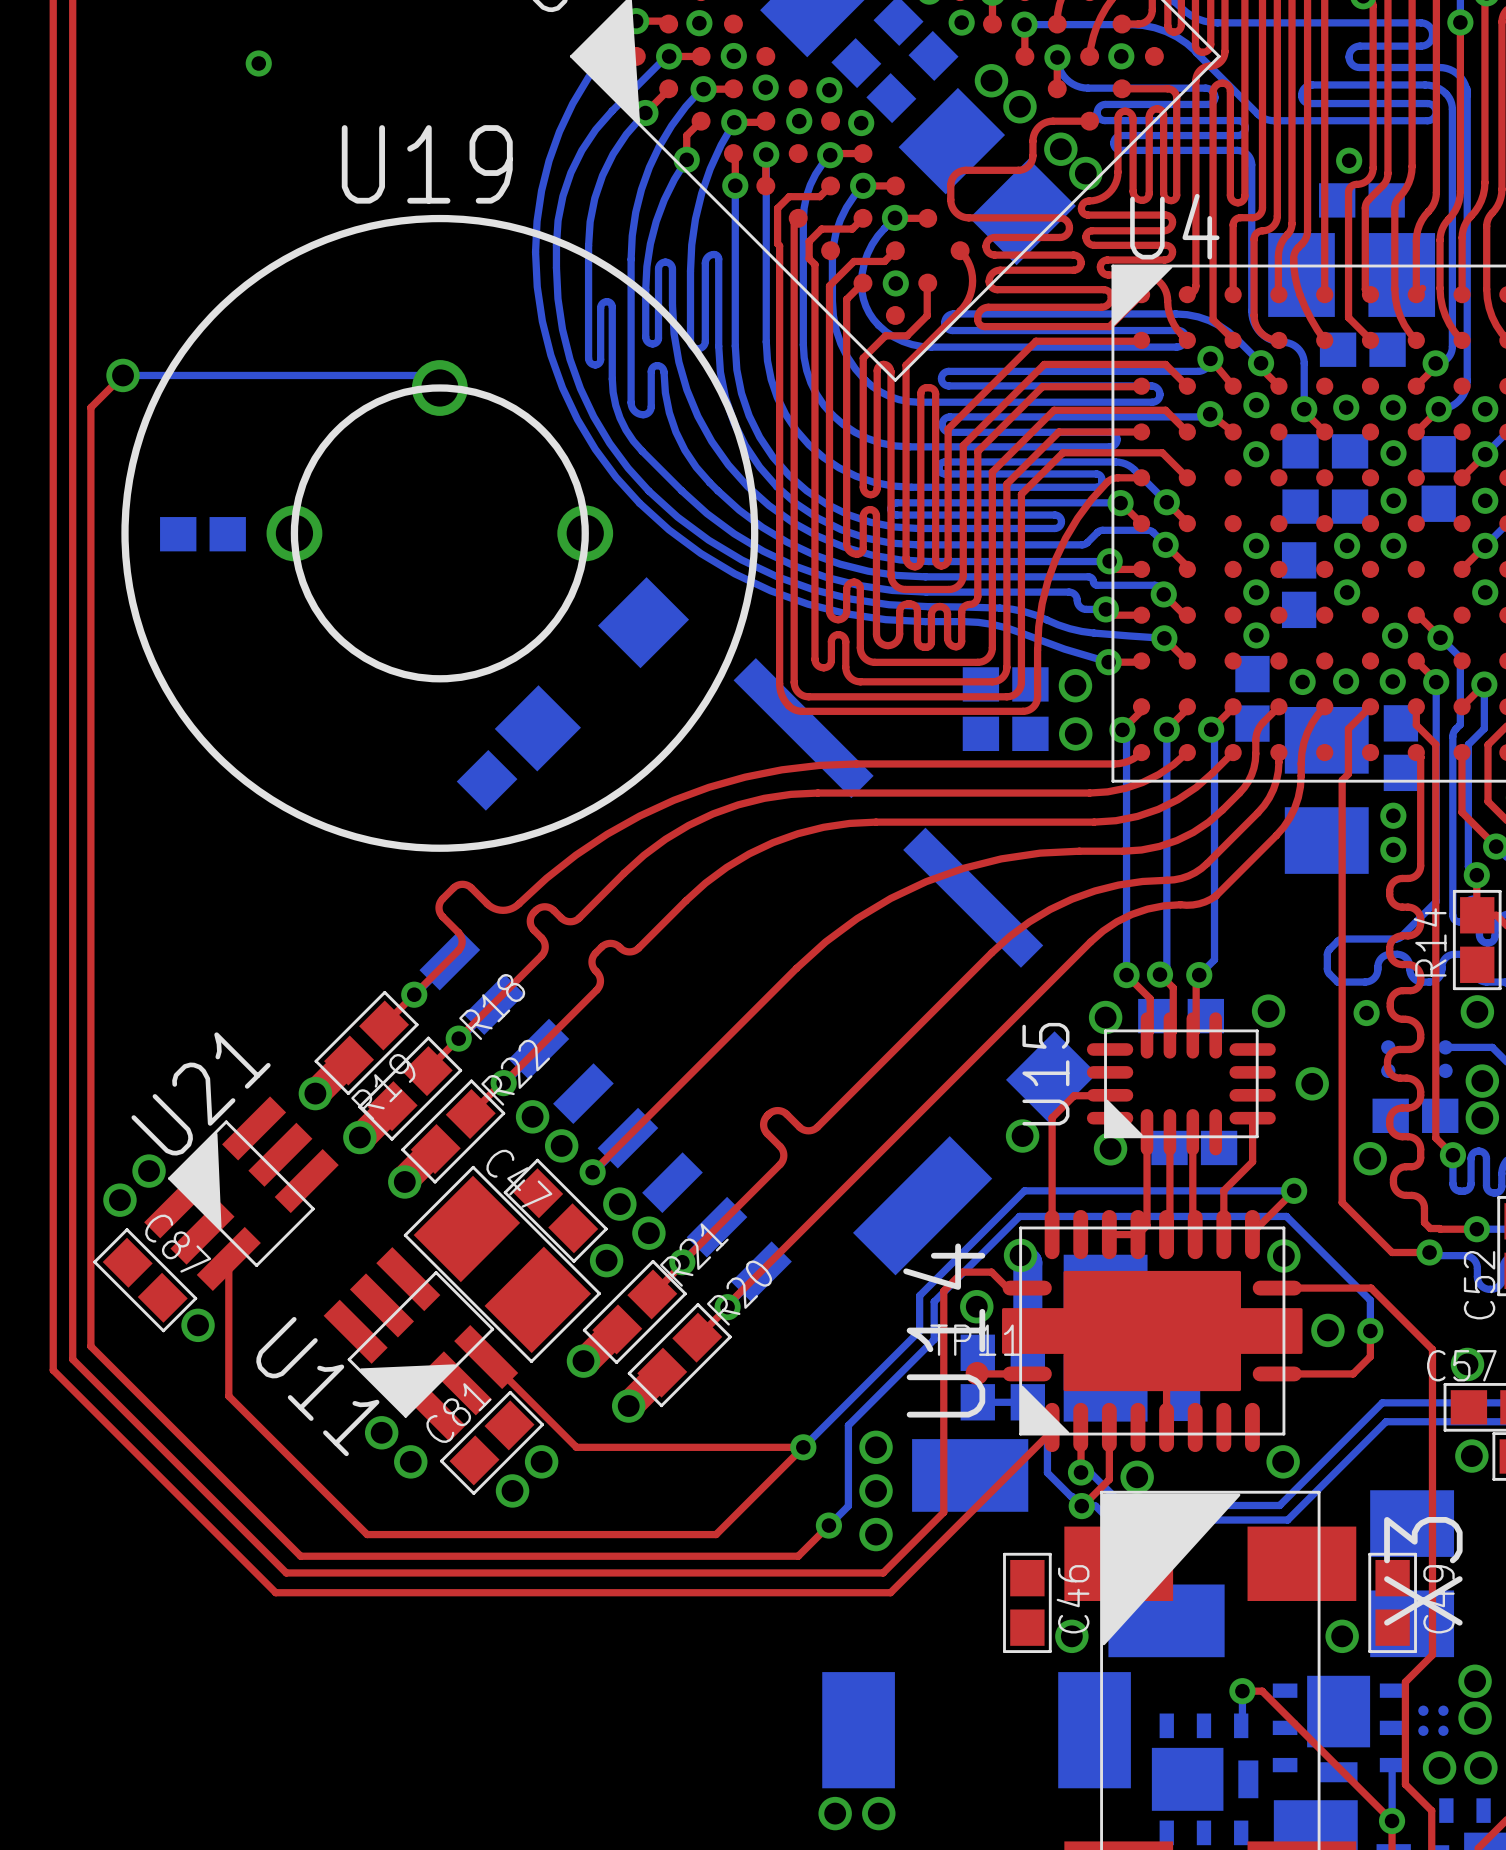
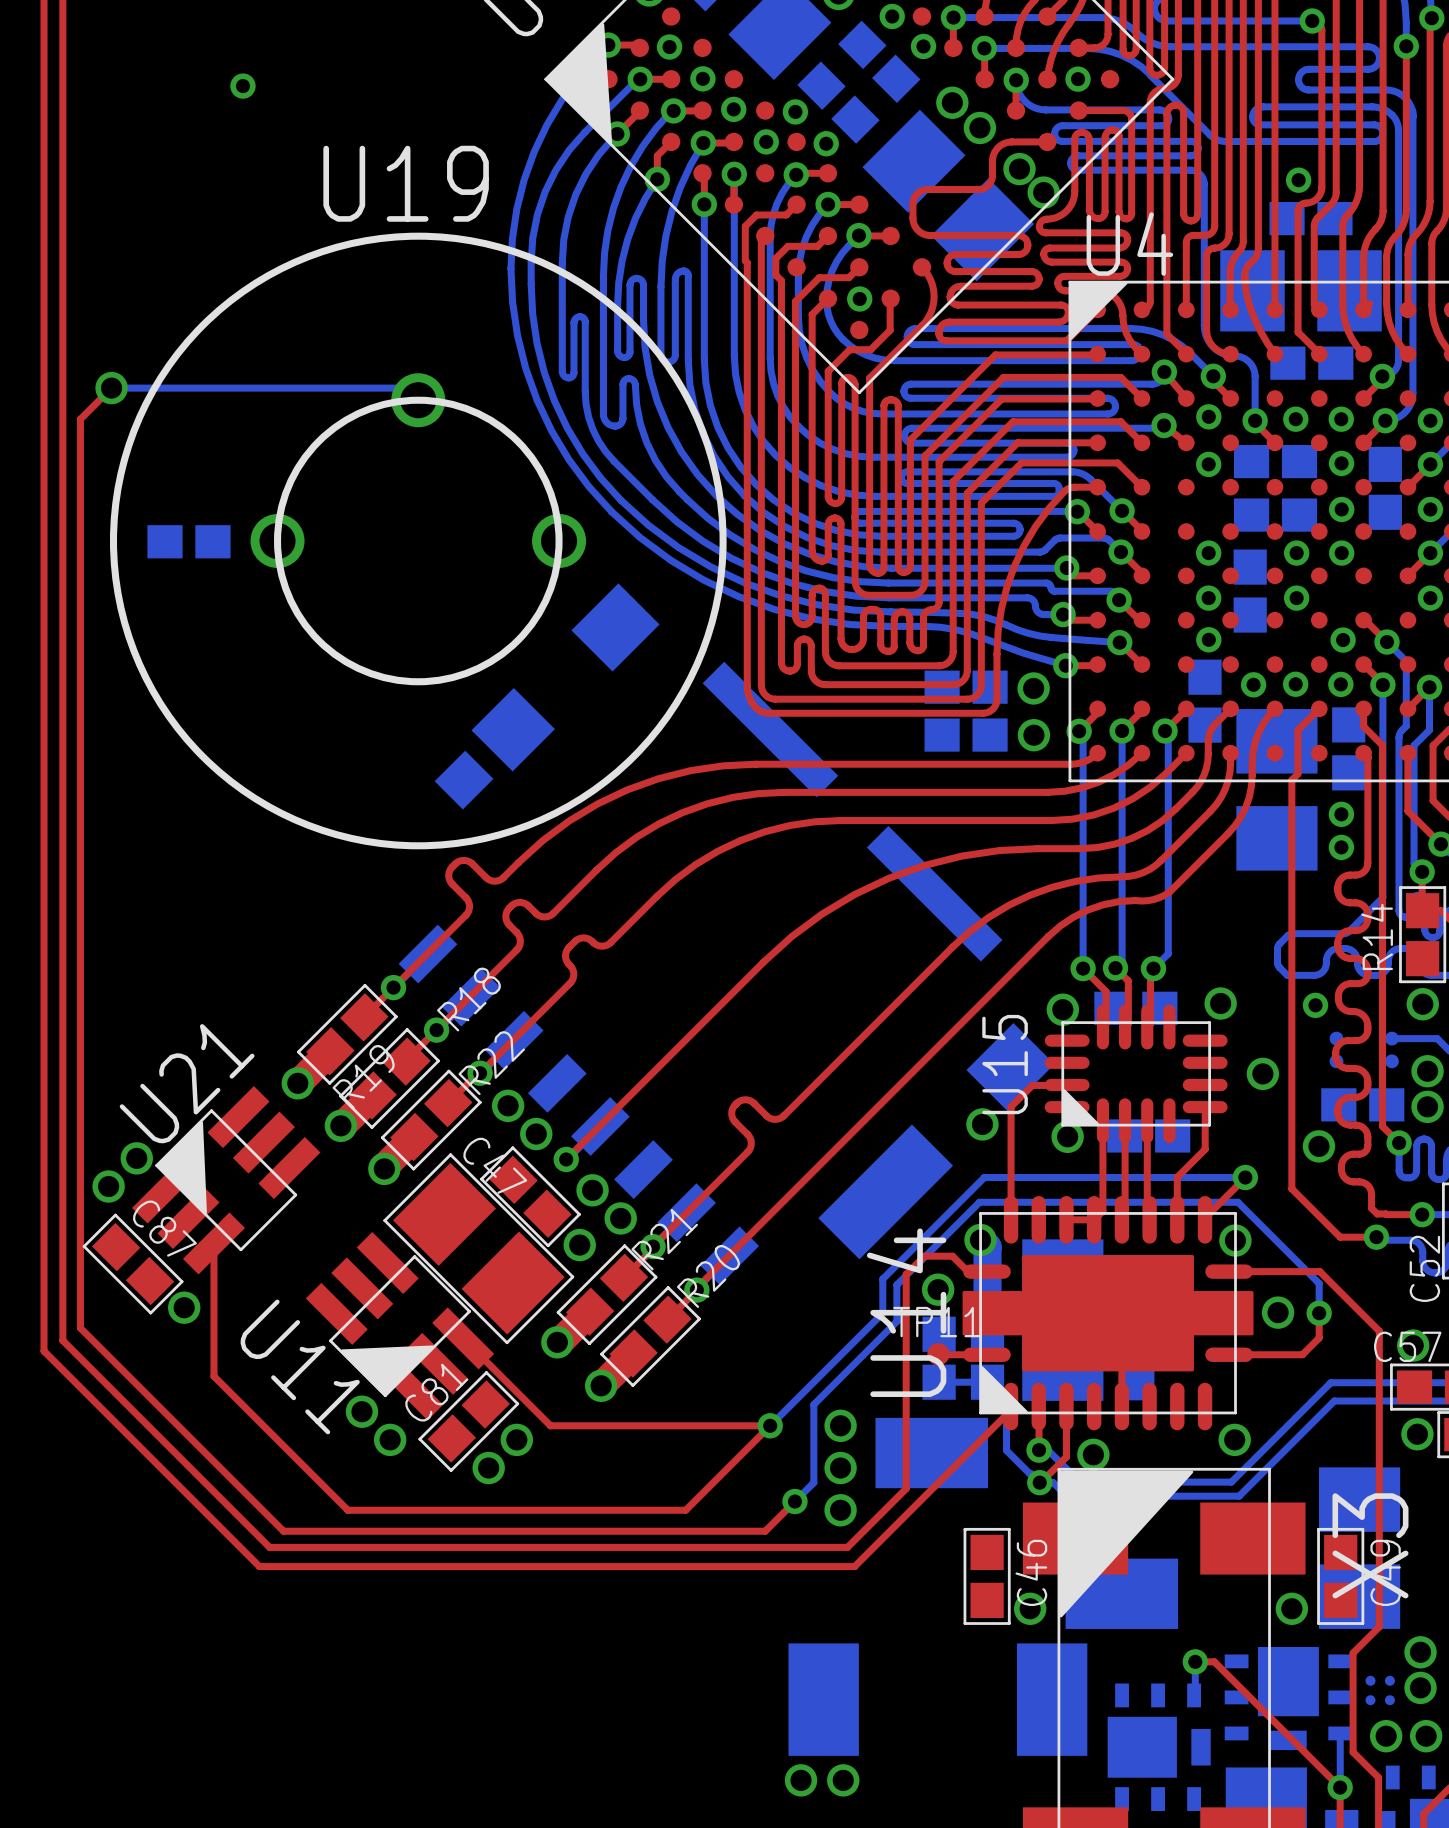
top track: (856, 763) (781, 769) (709, 787) (673, 800) (607, 834) (575, 855) (516, 905) (508, 909) (494, 908) (468, 886) (457, 885) (441, 900) (438, 907) (441, 915) (461, 936) (462, 943) (458, 950) -> (821, 764) (723, 765) (690, 770) (658, 778) (627, 789) (597, 803) (569, 820) (542, 840) (498, 880) (488, 879) (469, 862) (459, 861) (450, 869) (449, 878) (467, 900) (469, 909) (436, 944)

